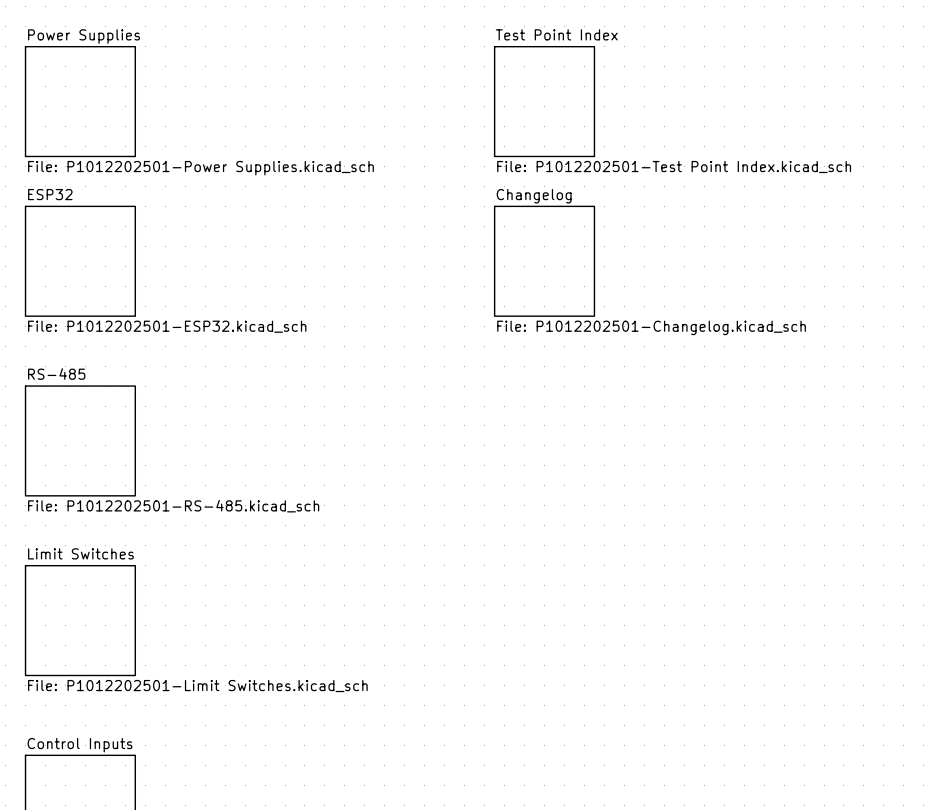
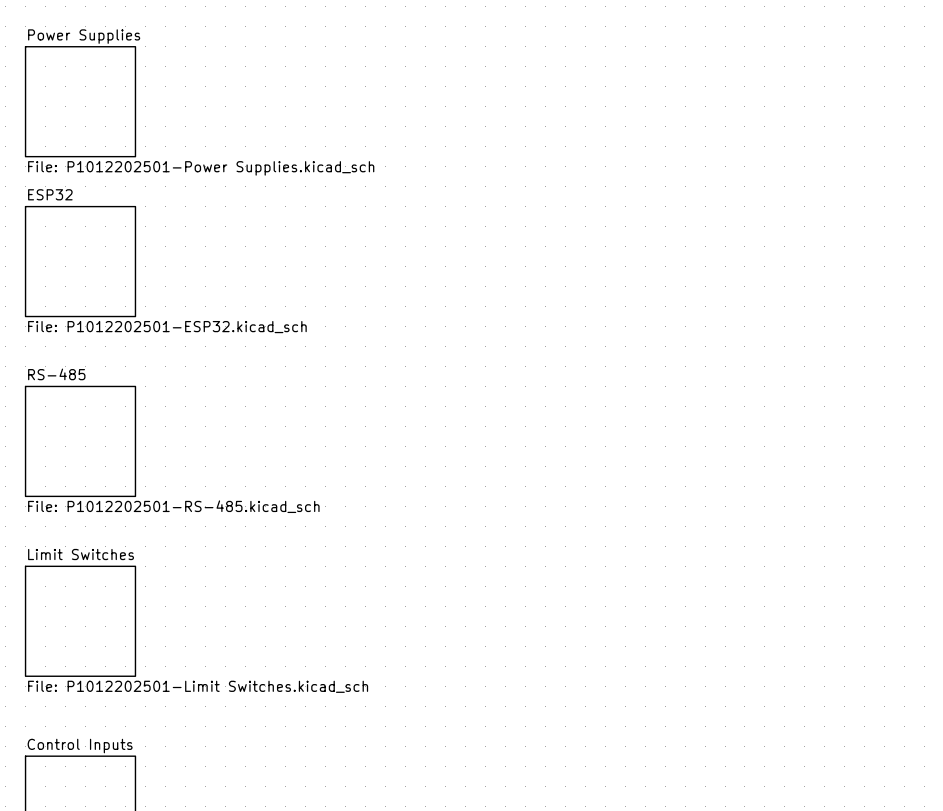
sheet Test Point Index: File: P1012202501-Test Point Index.kicad_sch (544, 101) -> none
sheet Changelog: File: P1012202501-Changelog.kicad_sch (544, 261) -> none

